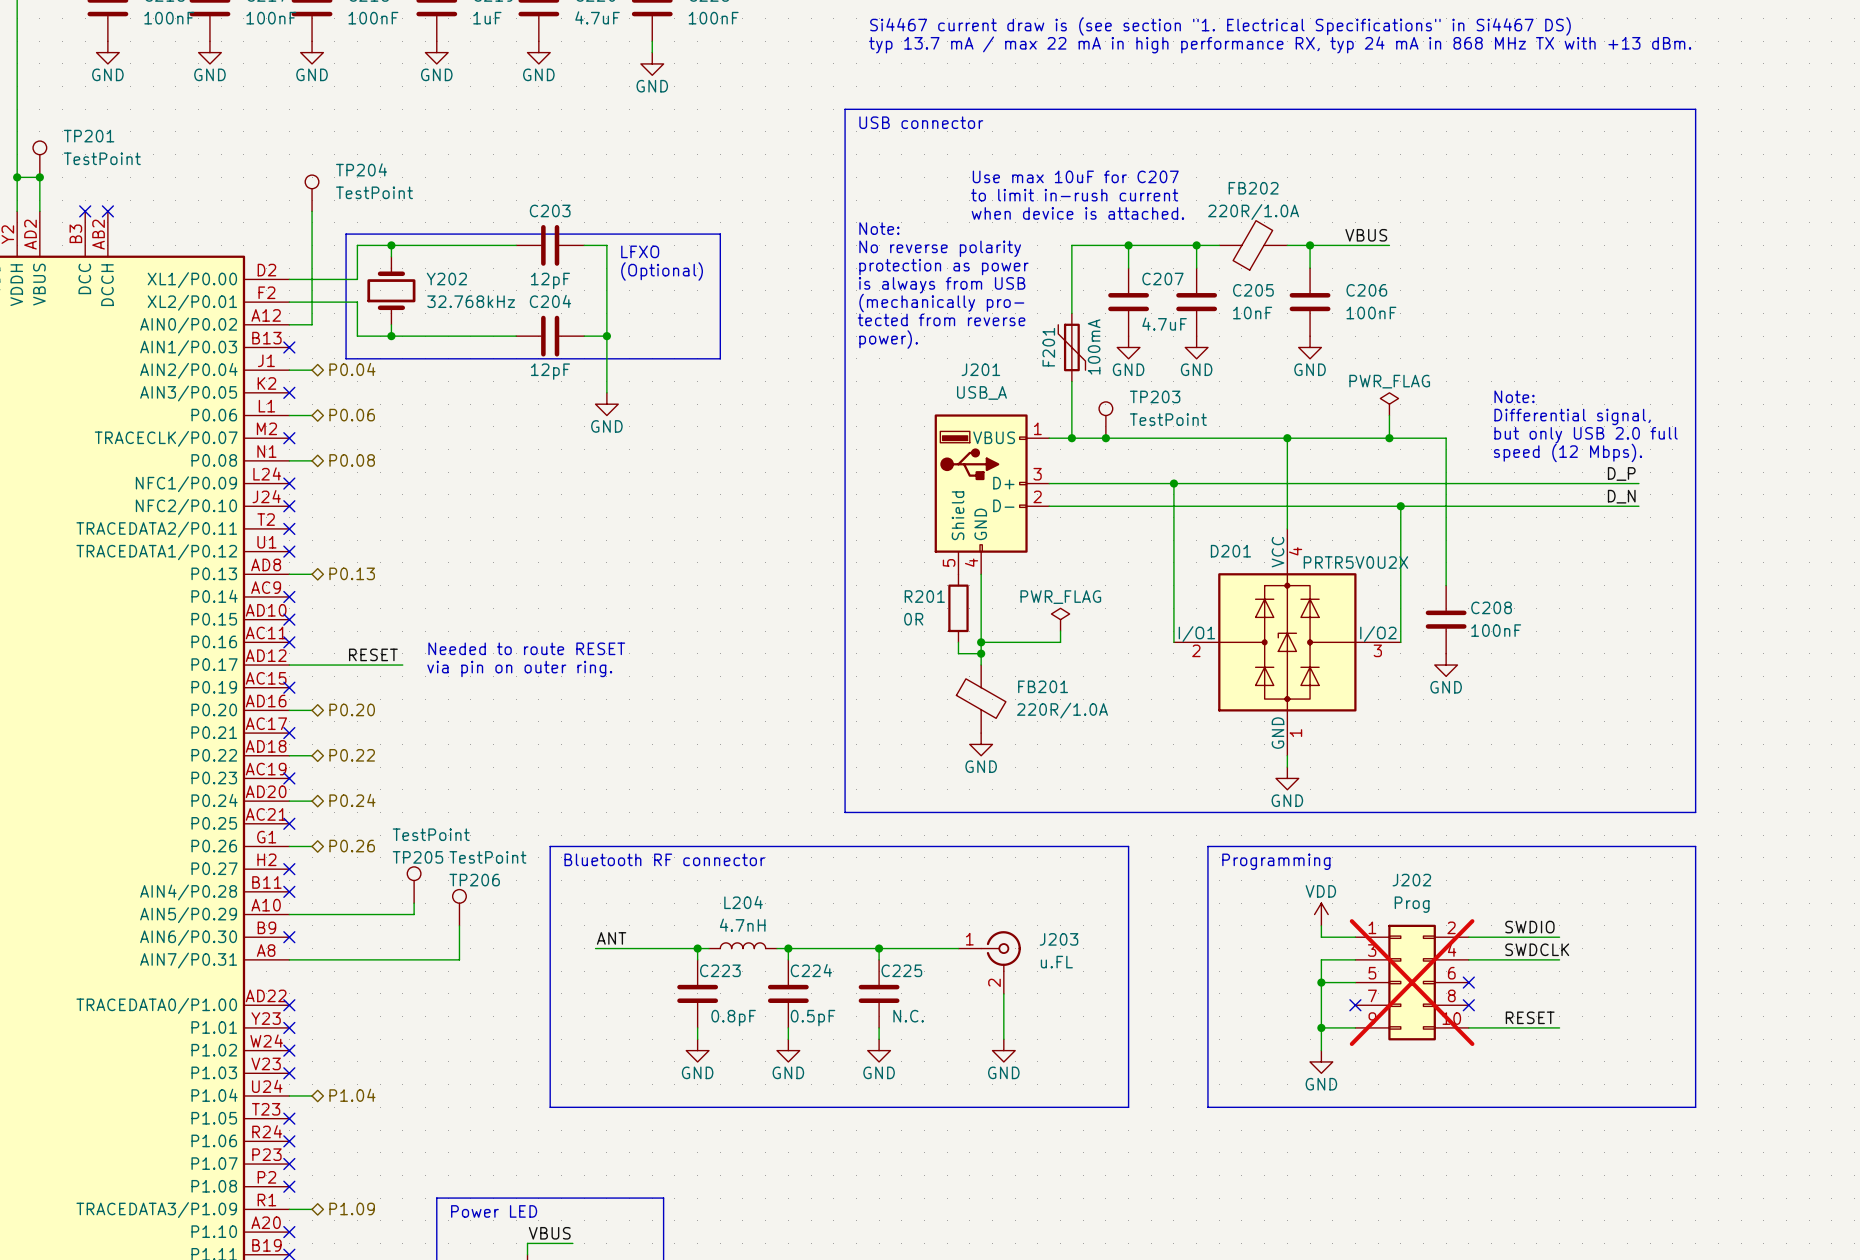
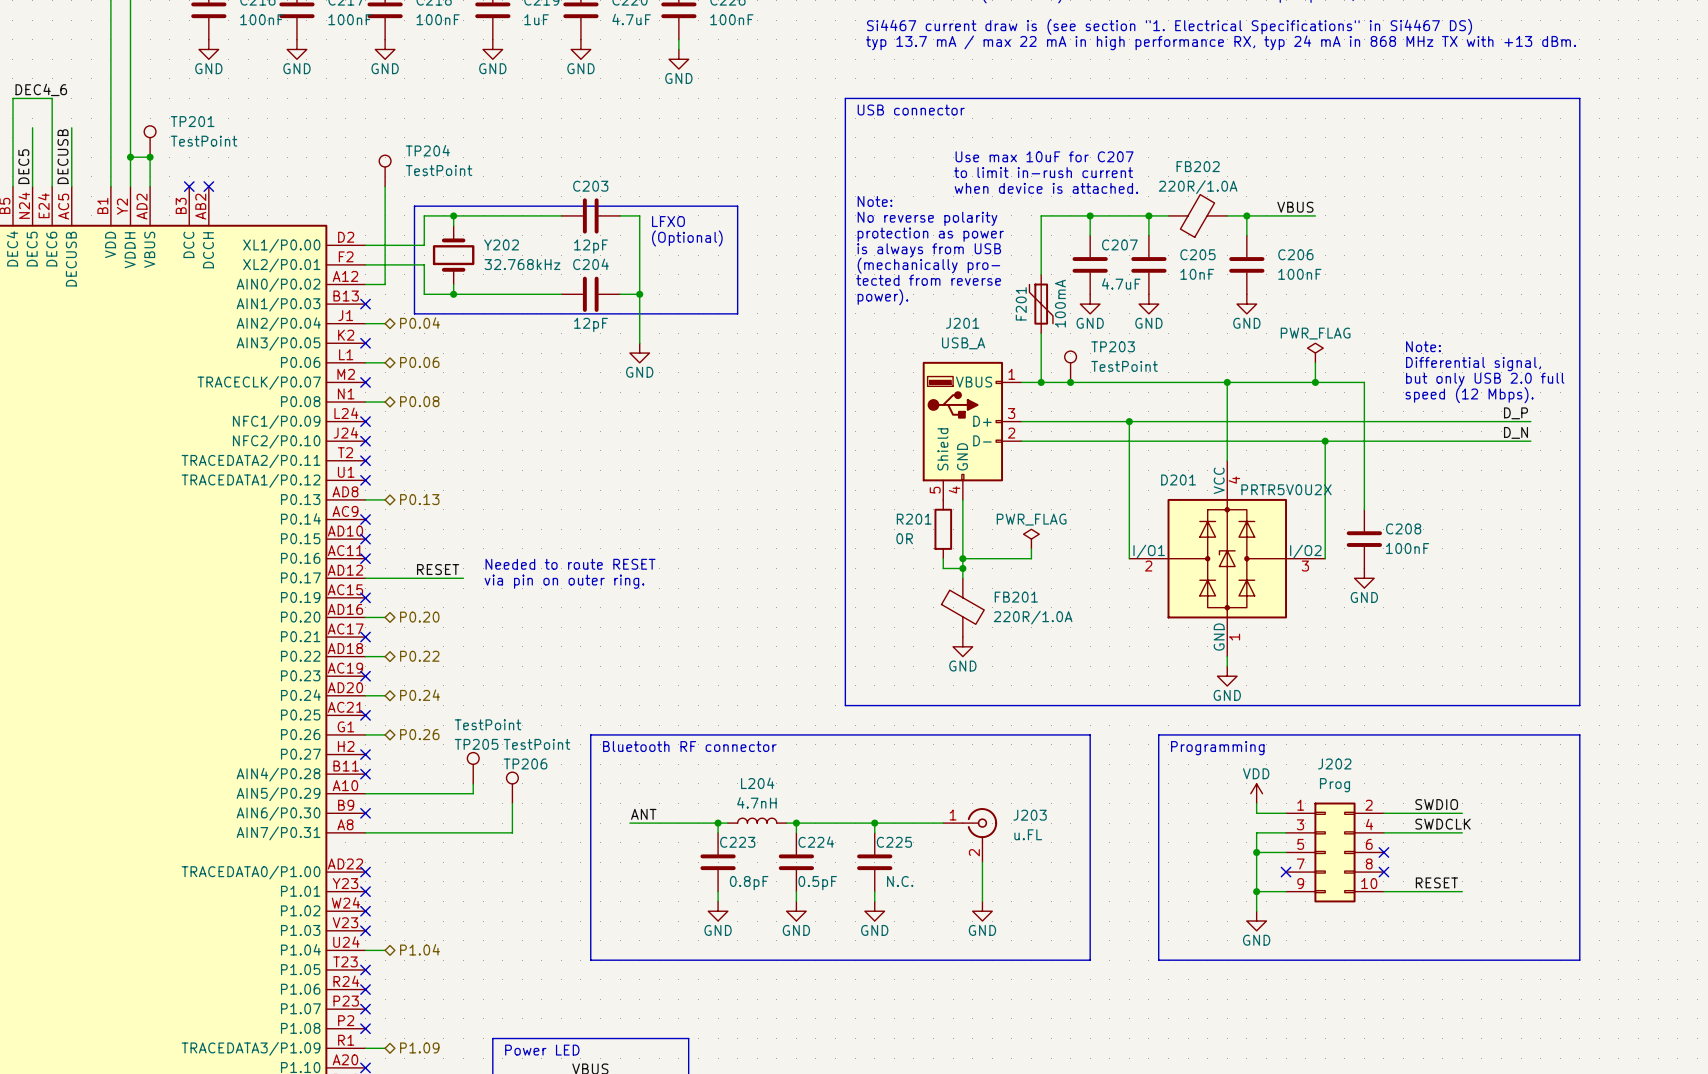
J202 do-not-place cross: (1412, 982) -> none

